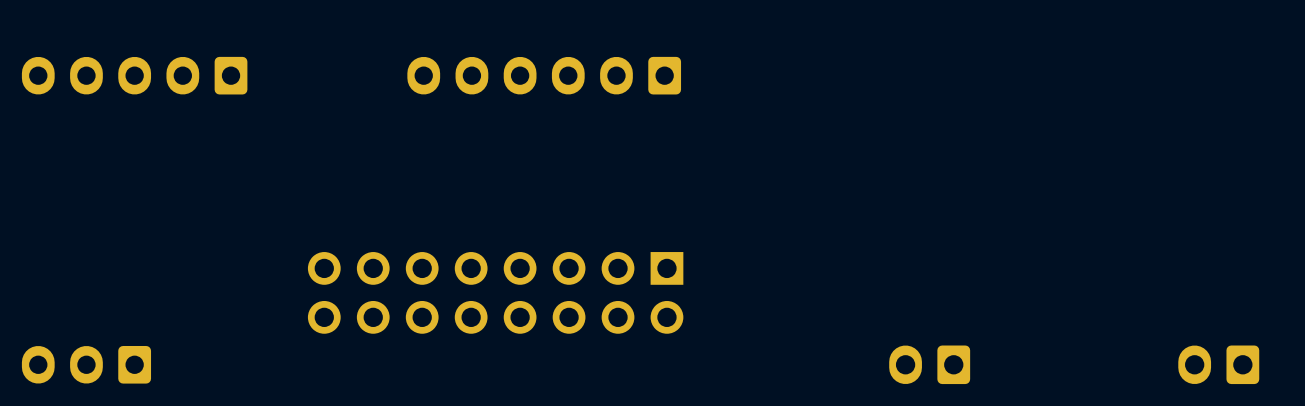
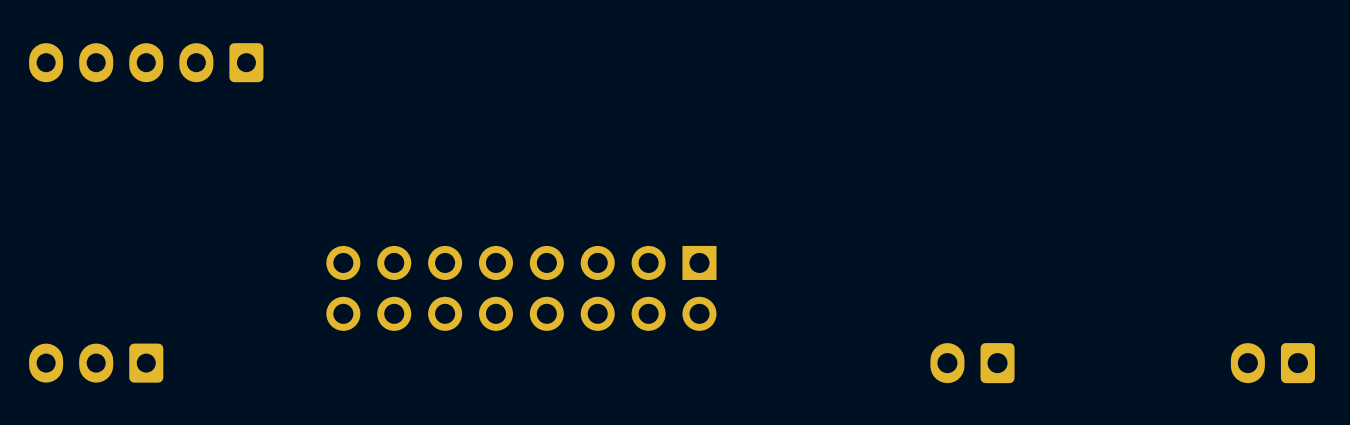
part: (544, 75) -> none

